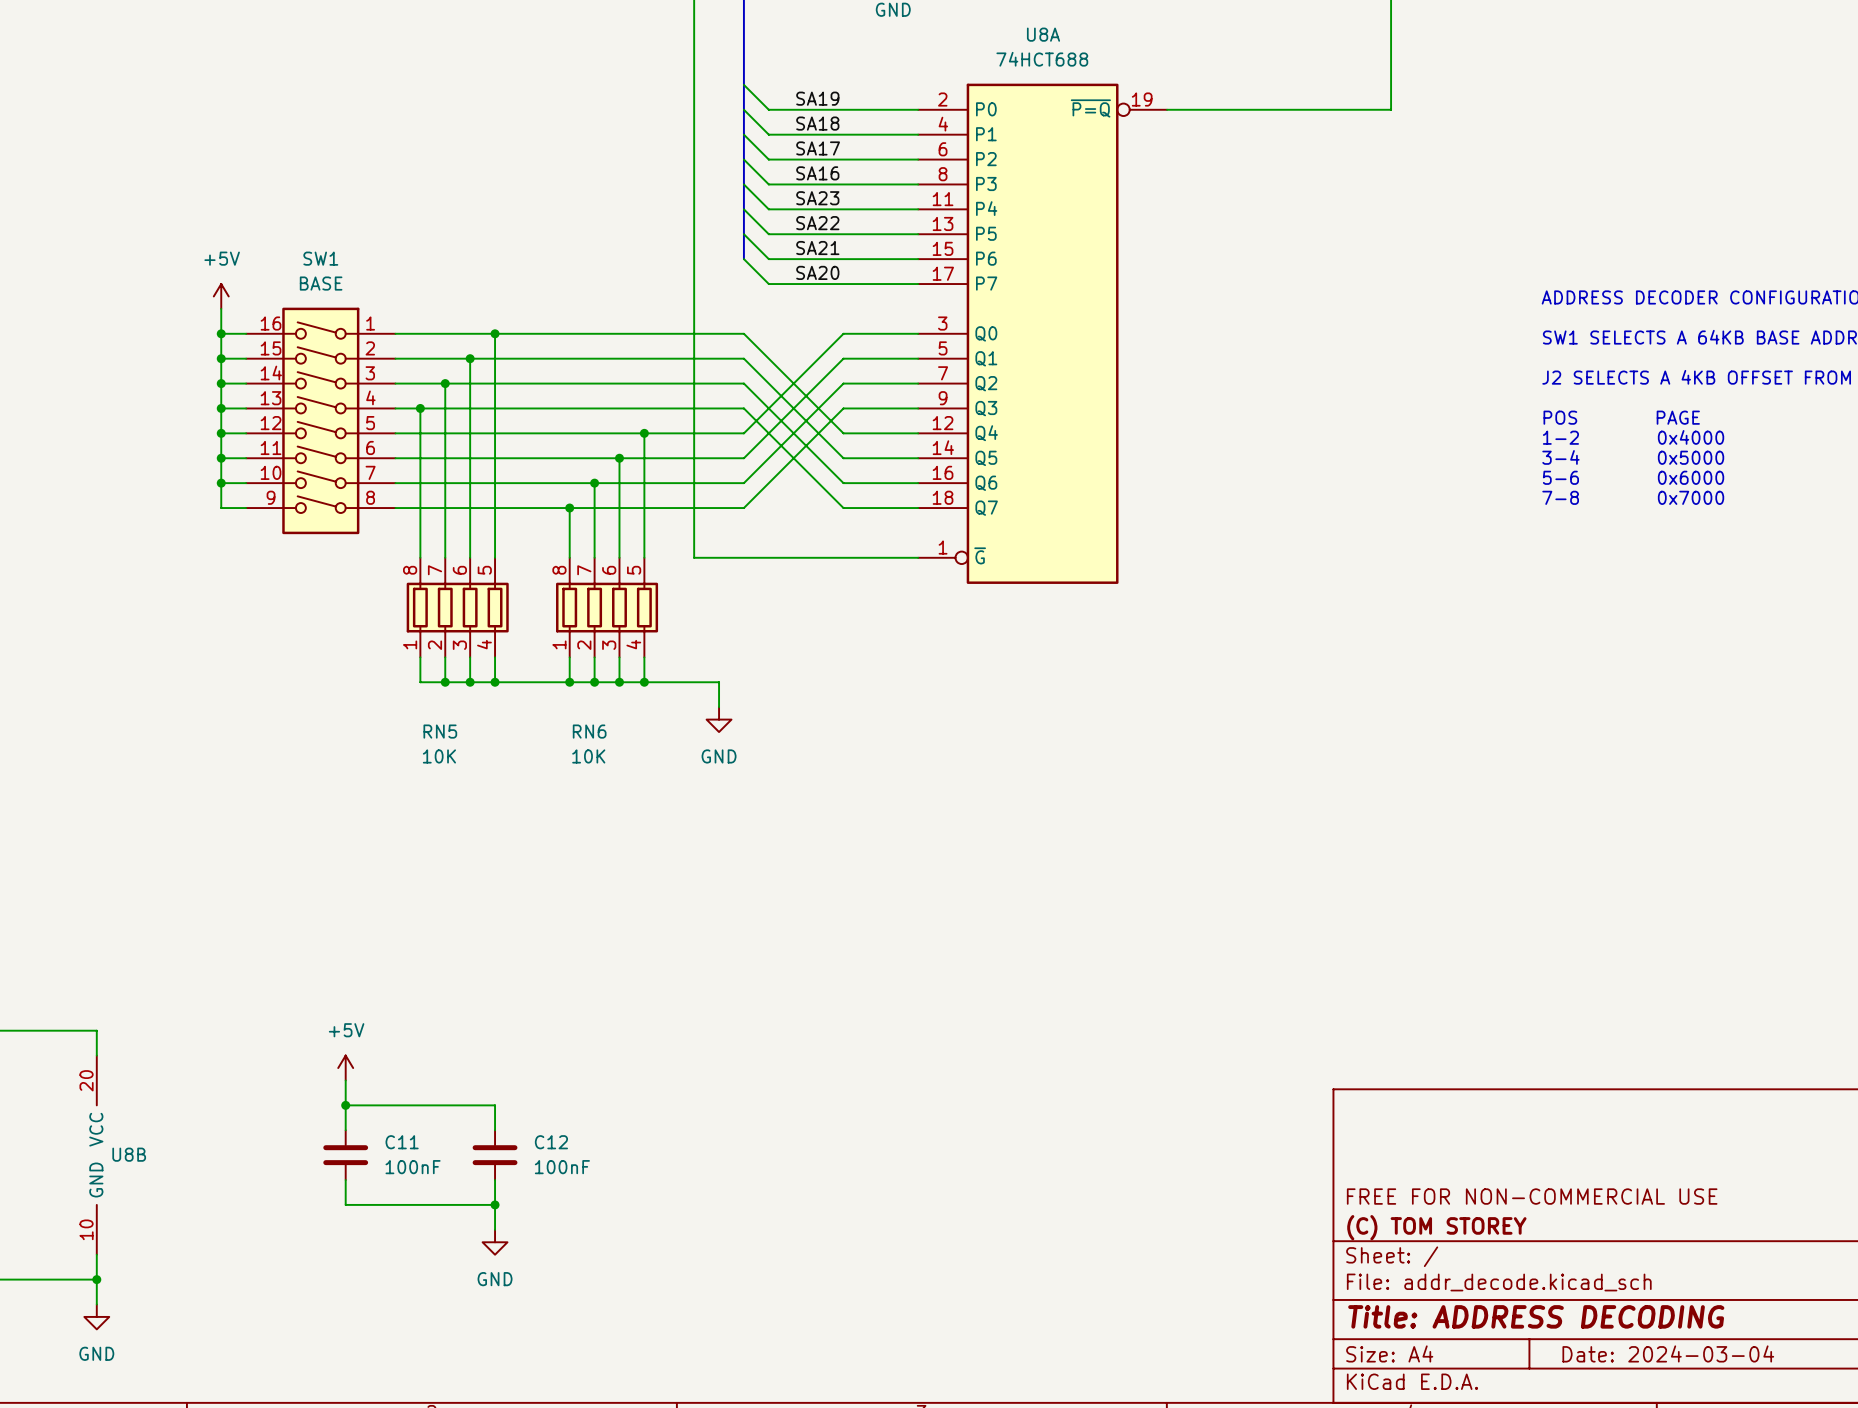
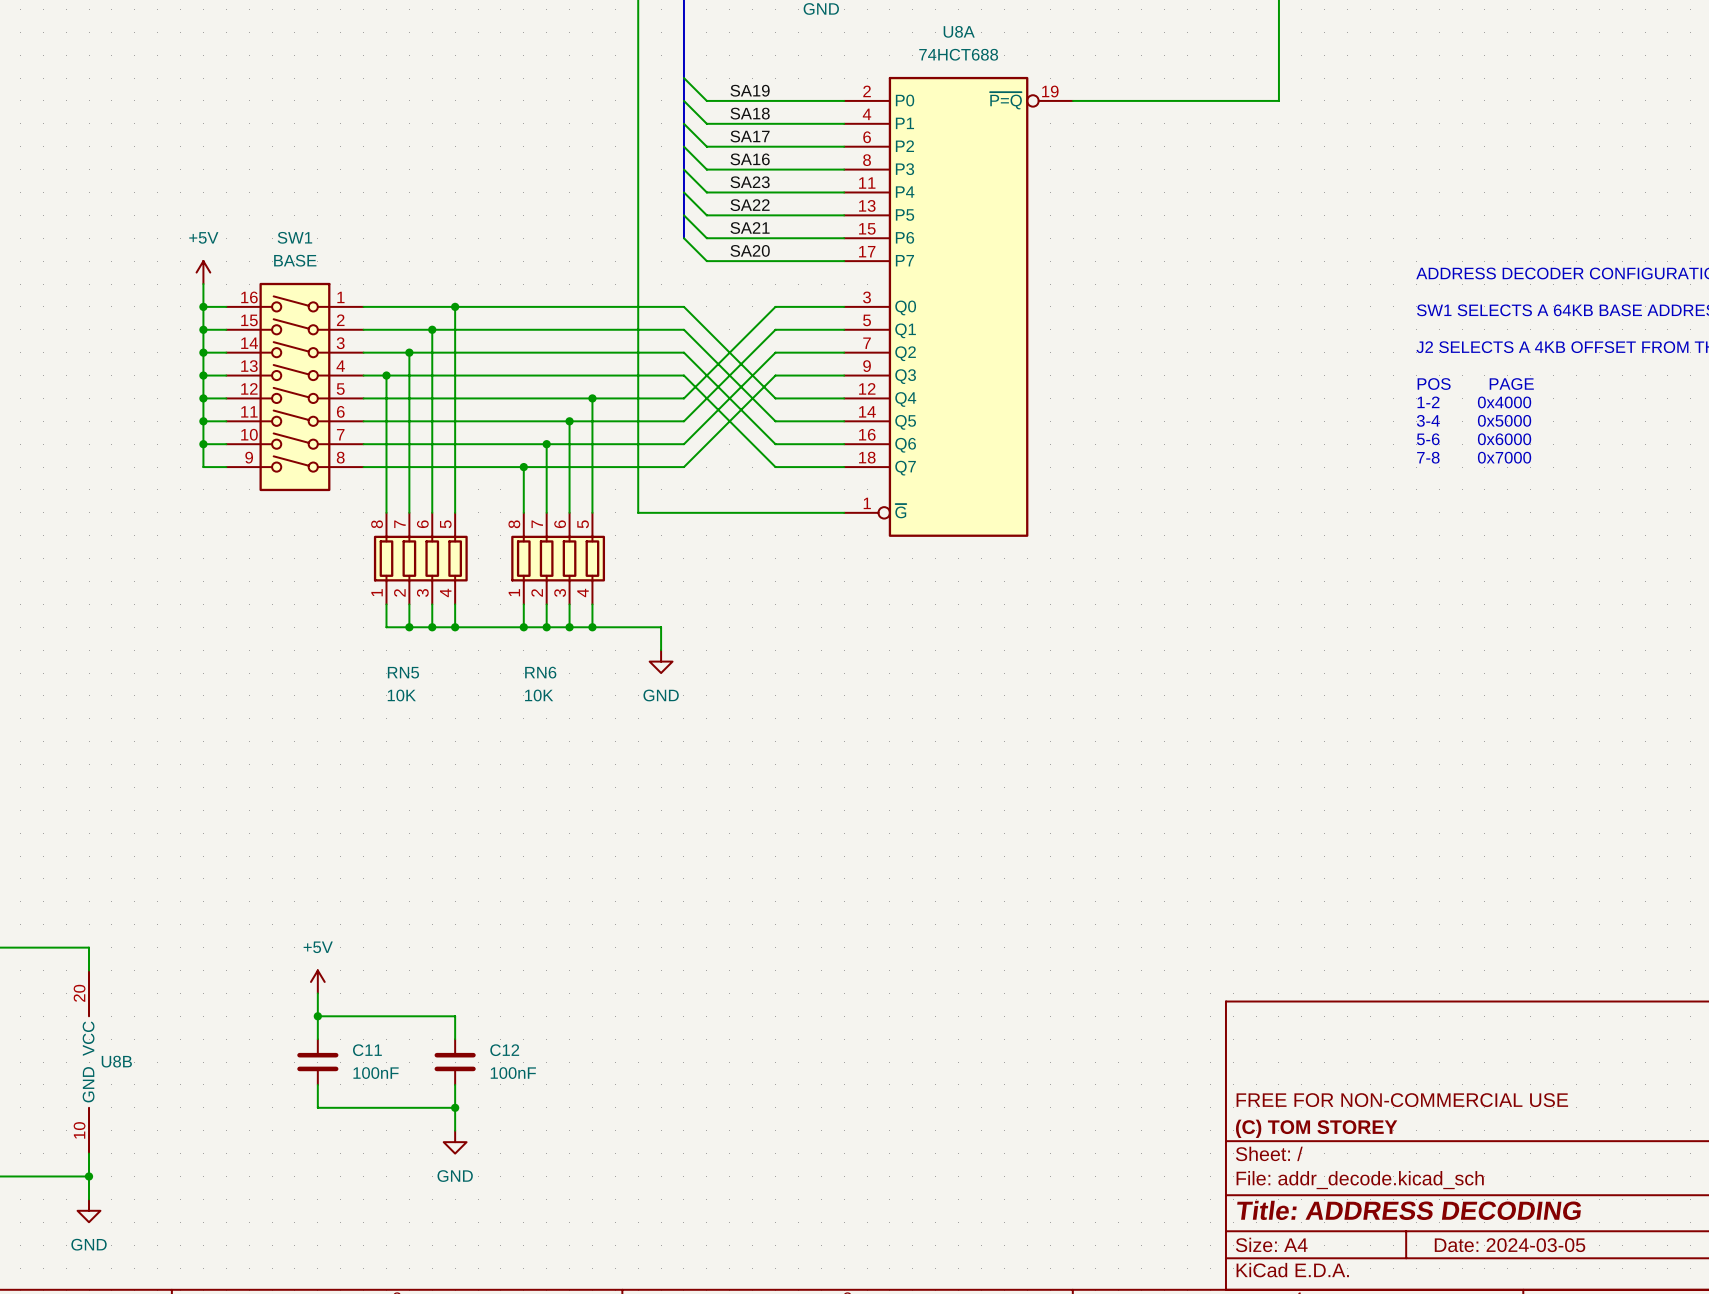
title block: Date: 2024-03-04 (1668, 1353) -> Date: 2024-03-05 (1510, 1245)

